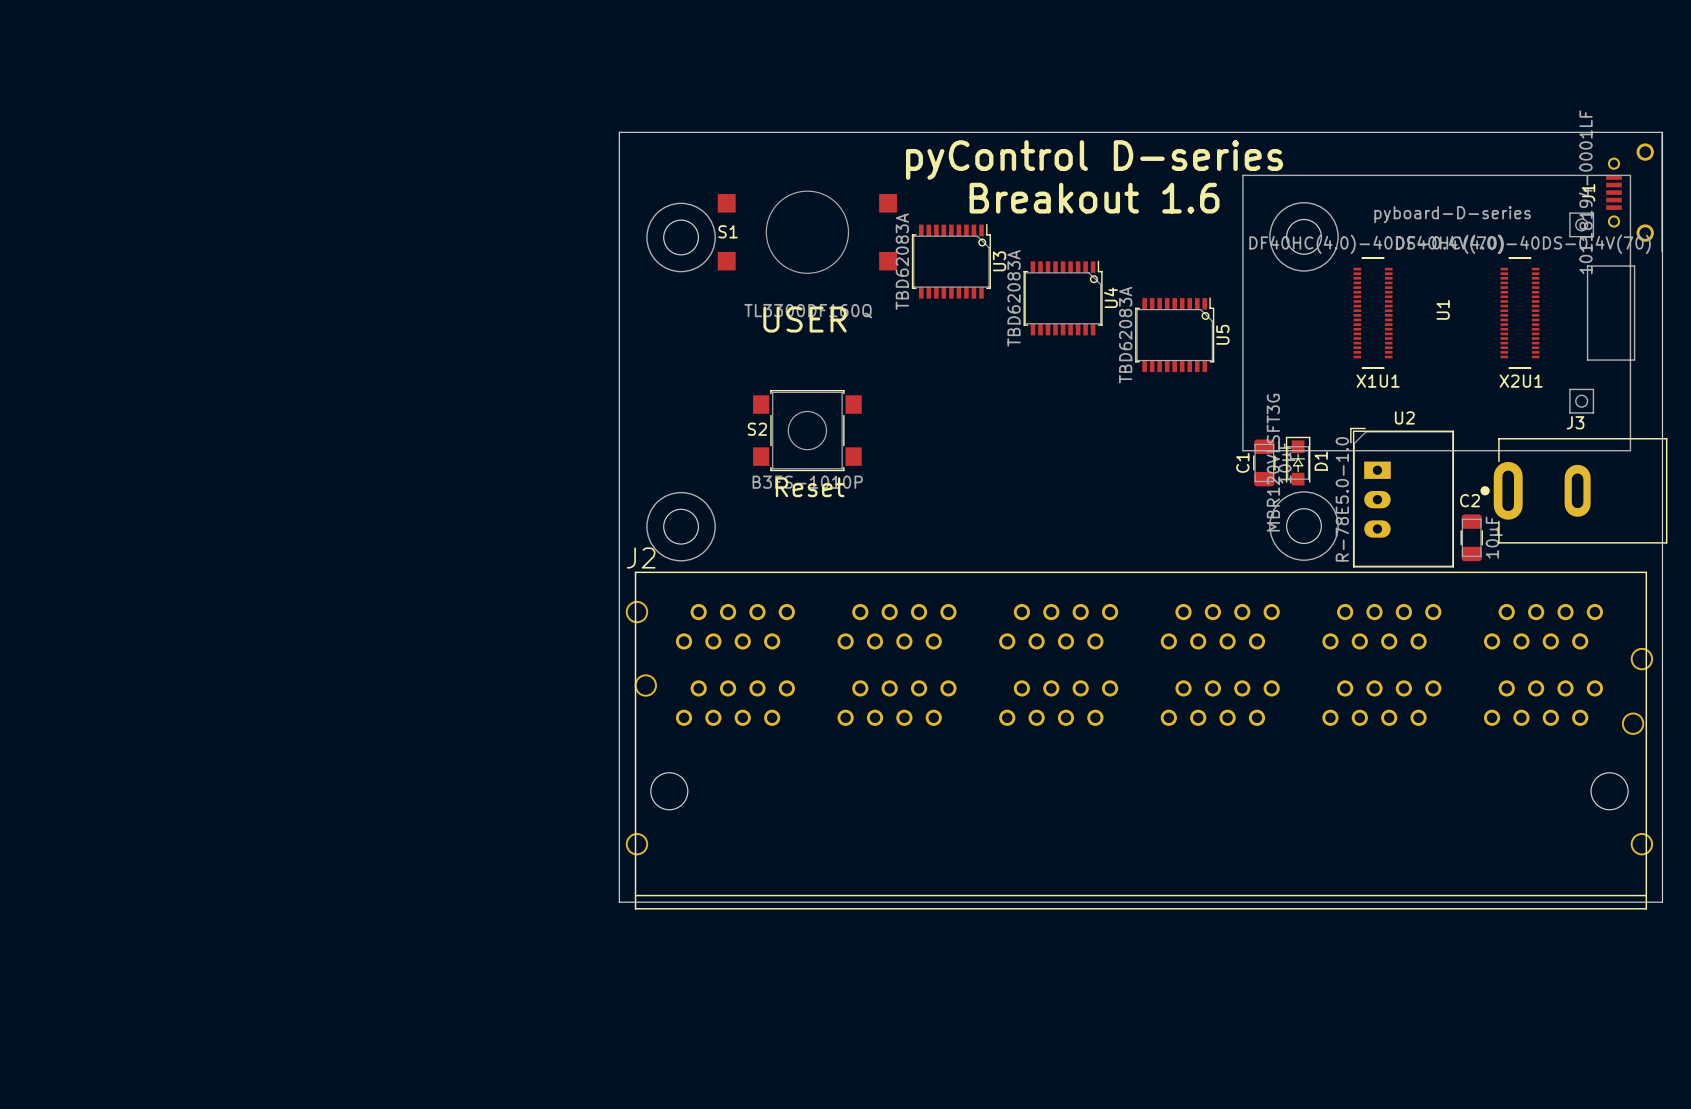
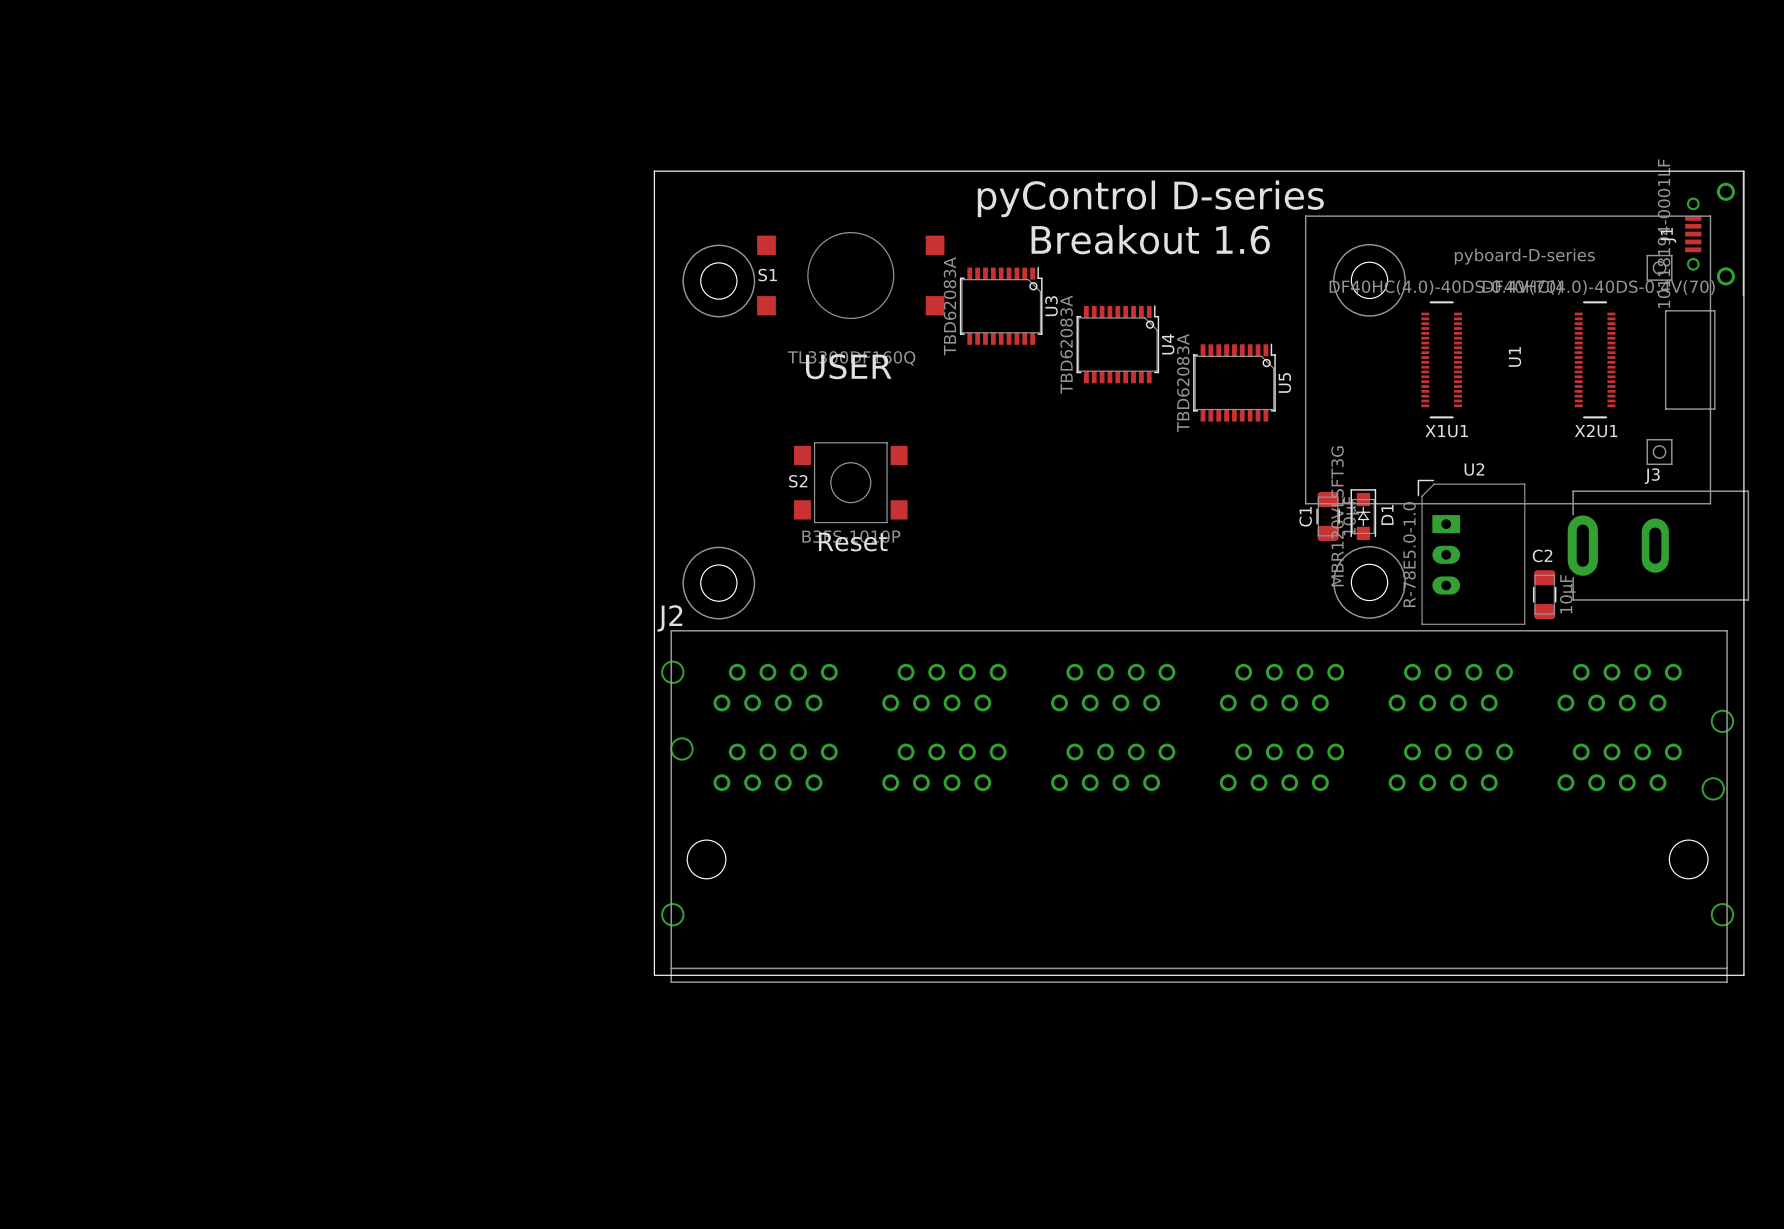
S2 footprint: [753, 389, 862, 472] -> [794, 442, 908, 524]
U2 footprint: [1350, 427, 1455, 568] -> [1417, 479, 1526, 625]
J3 footprint: [1480, 438, 1668, 544] -> [1567, 490, 1750, 601]
J2 footprint: [625, 571, 1654, 910] -> [661, 630, 1735, 983]

